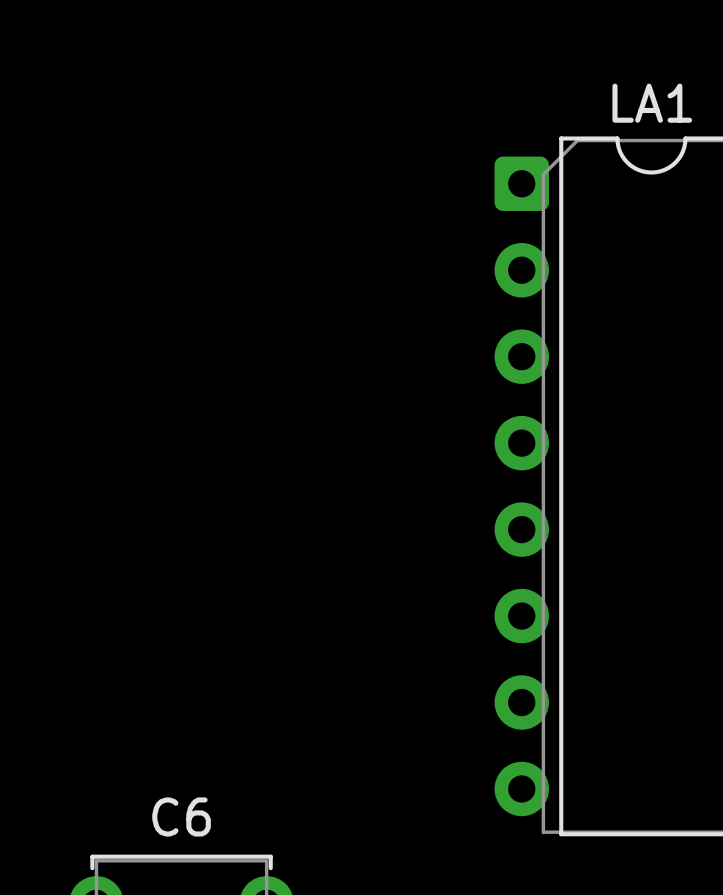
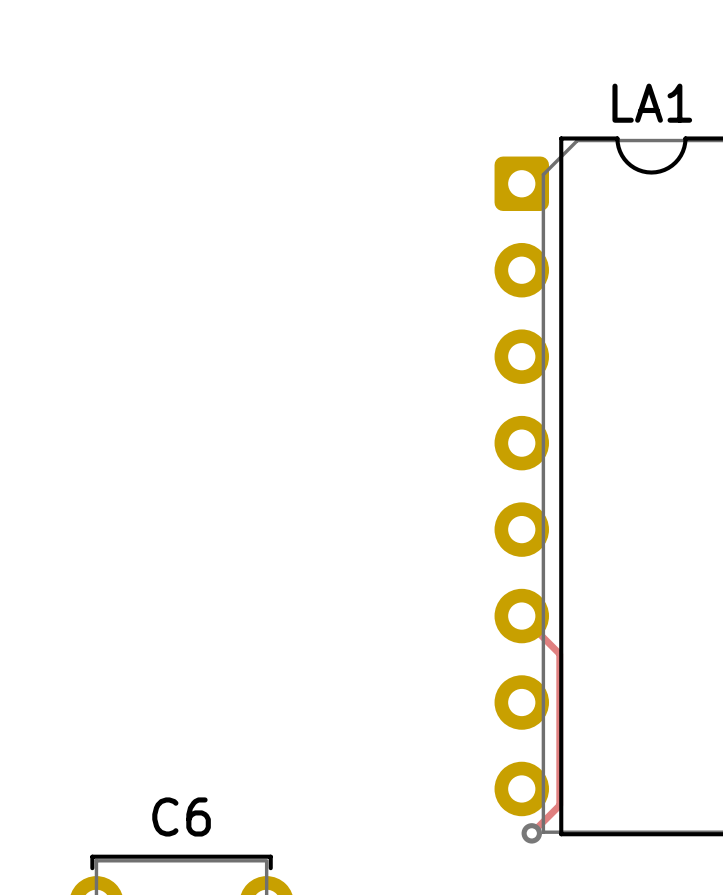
track: none -> (521, 616) (559, 654) (559, 805) (531, 833)
via: none -> (531, 833)

